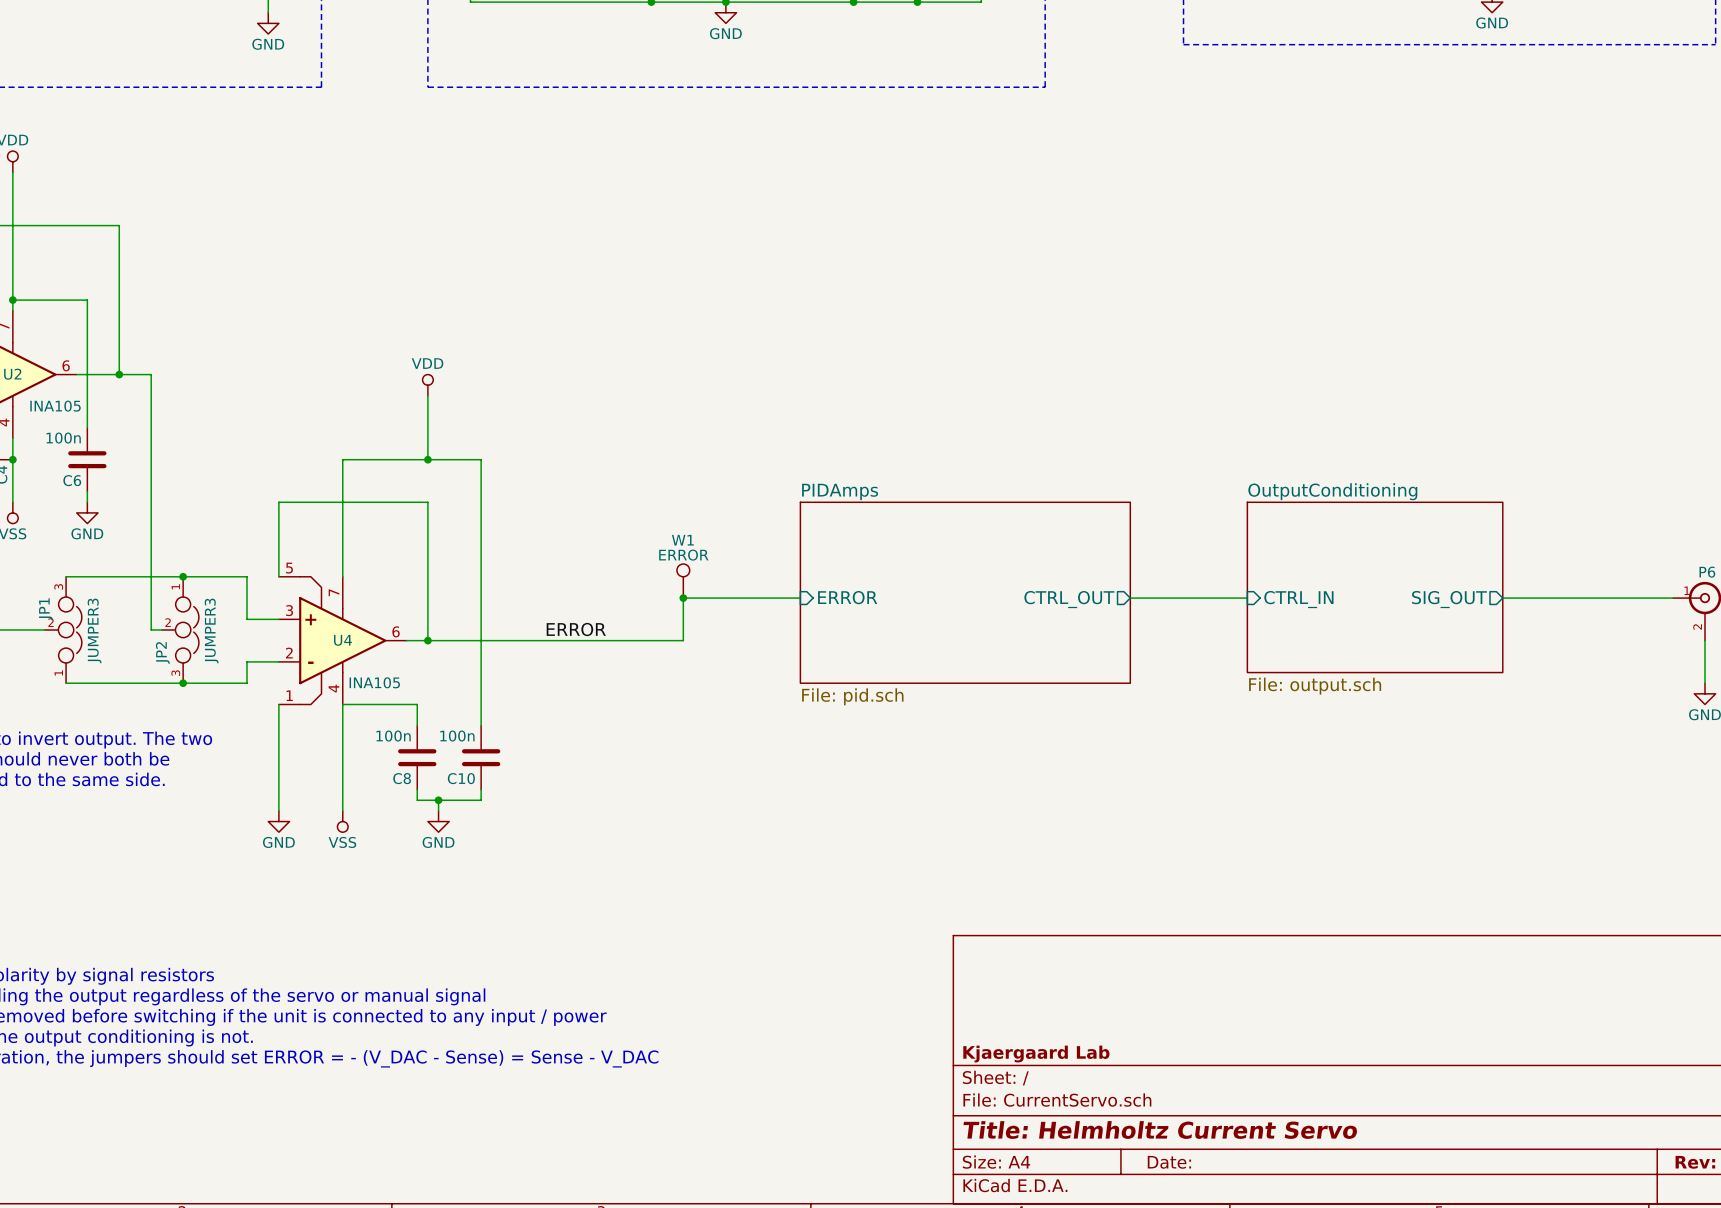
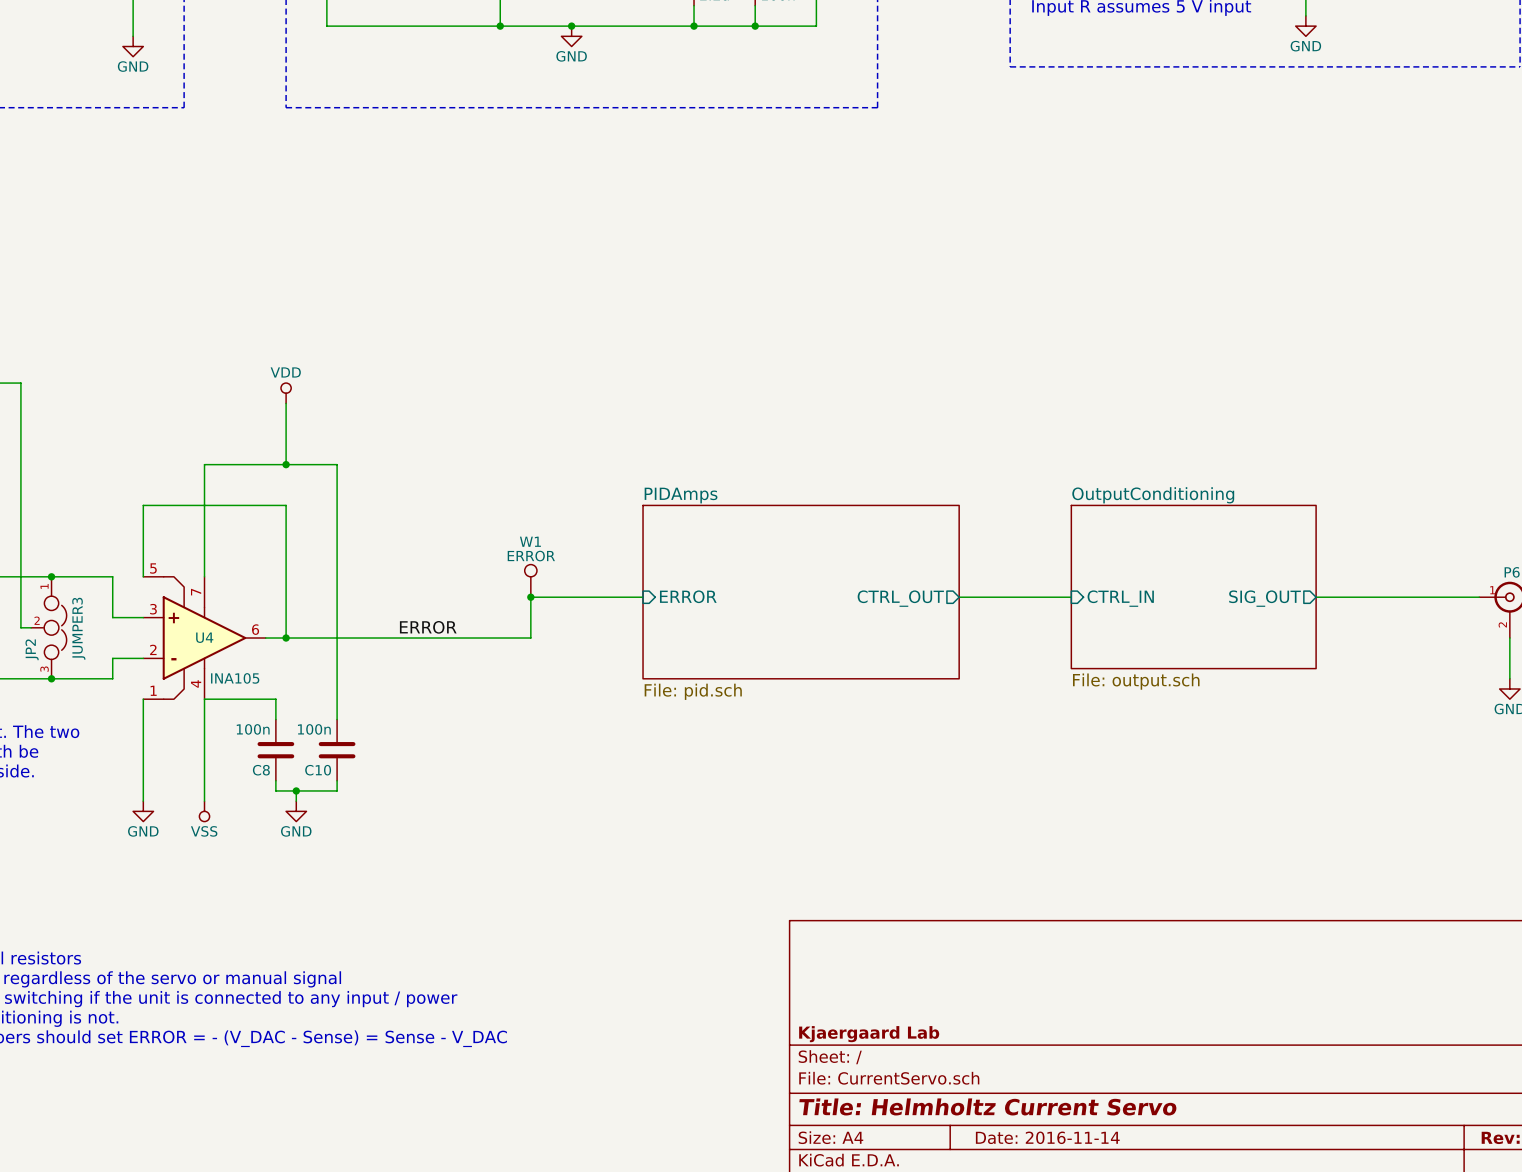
title block: Date: (1169, 1162) -> Date: 2016-11-14 (1047, 1137)

